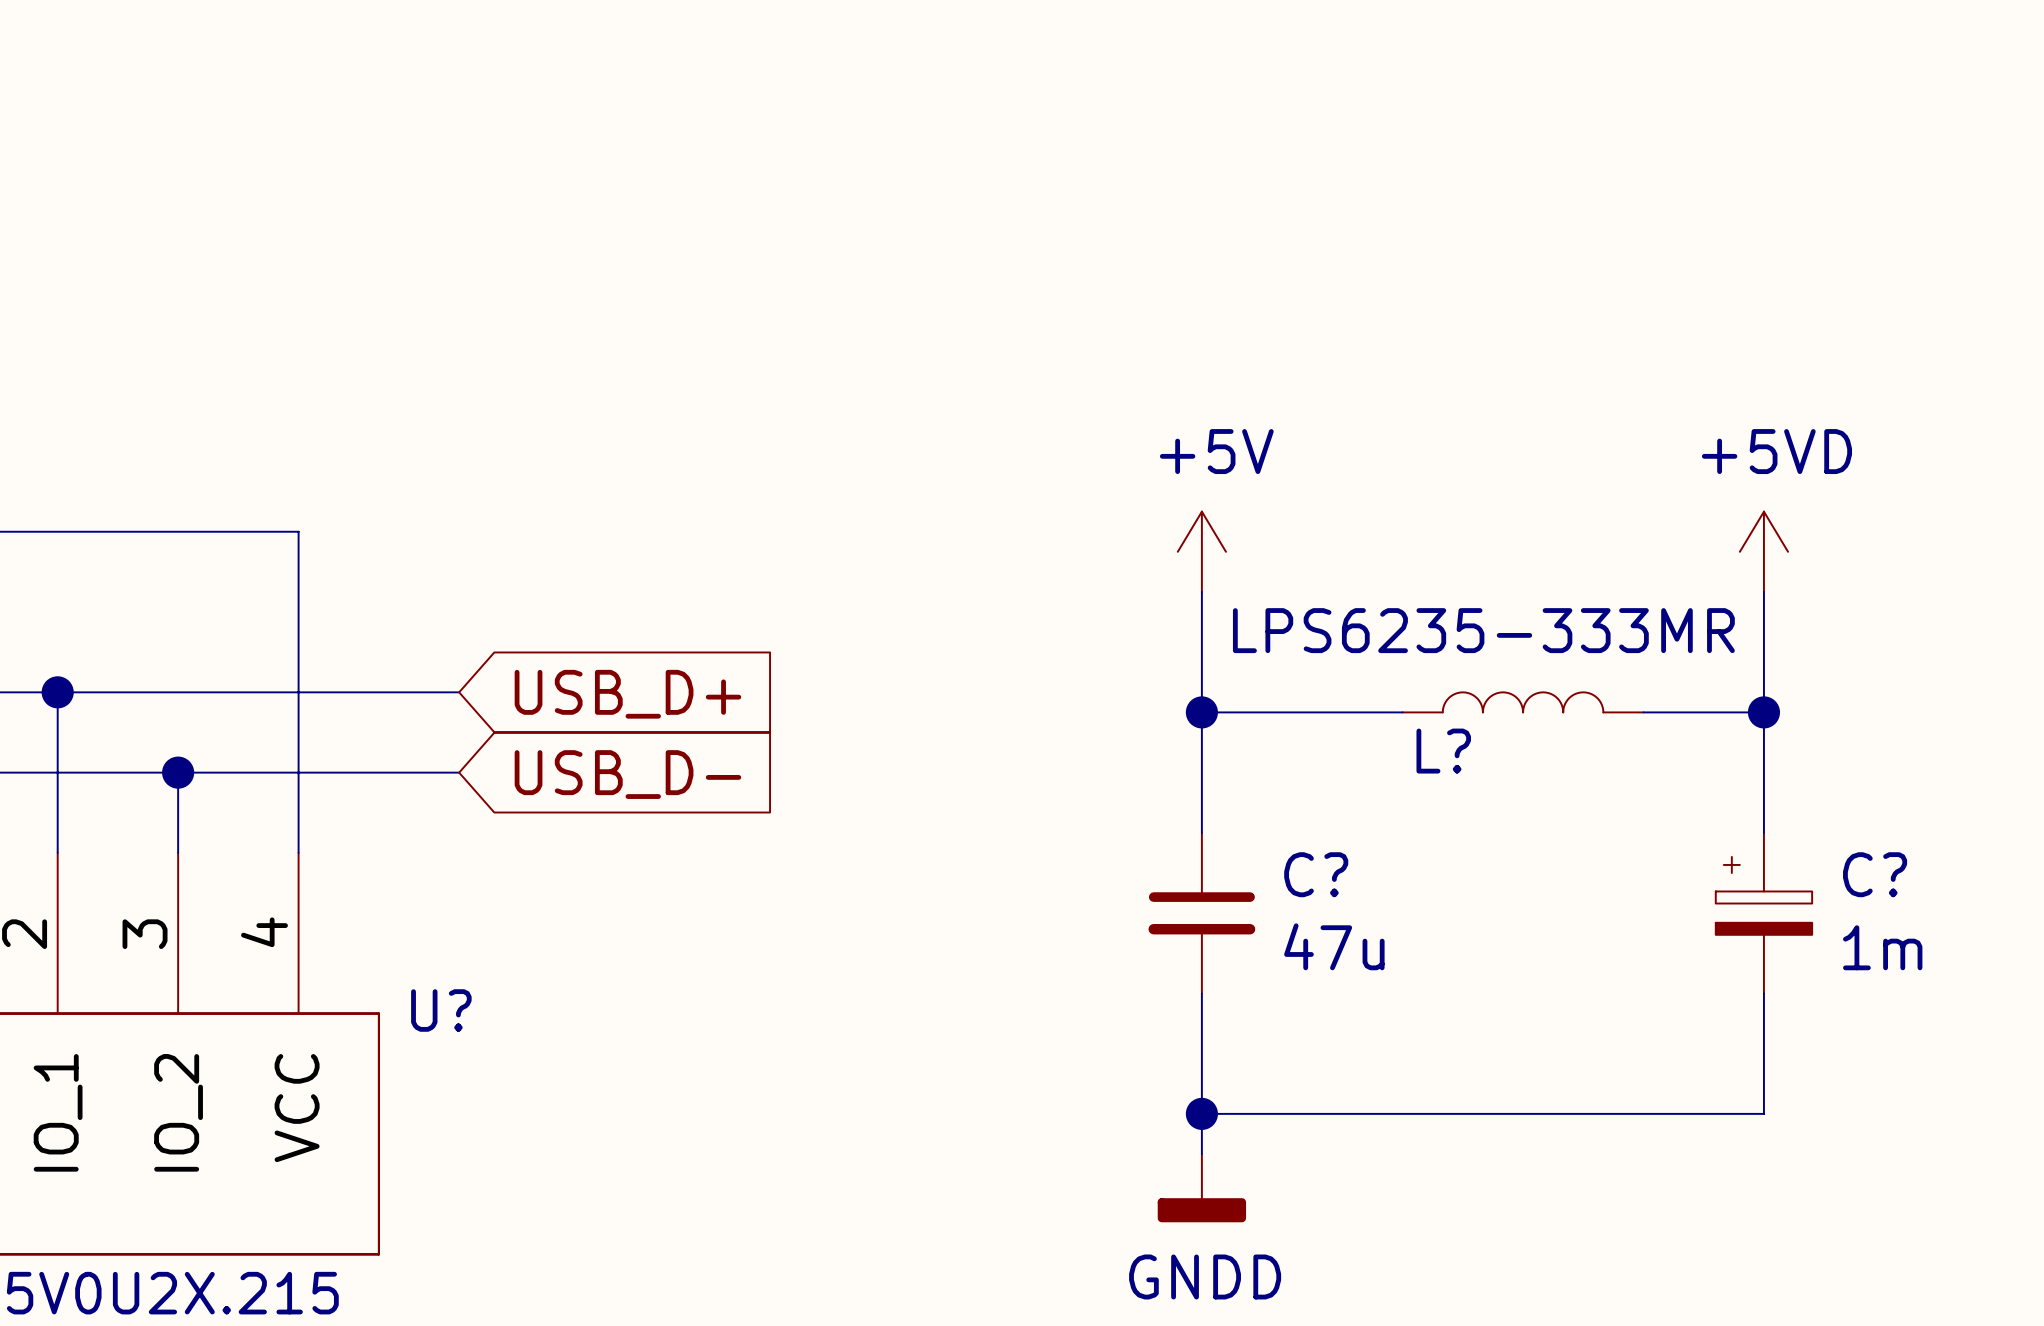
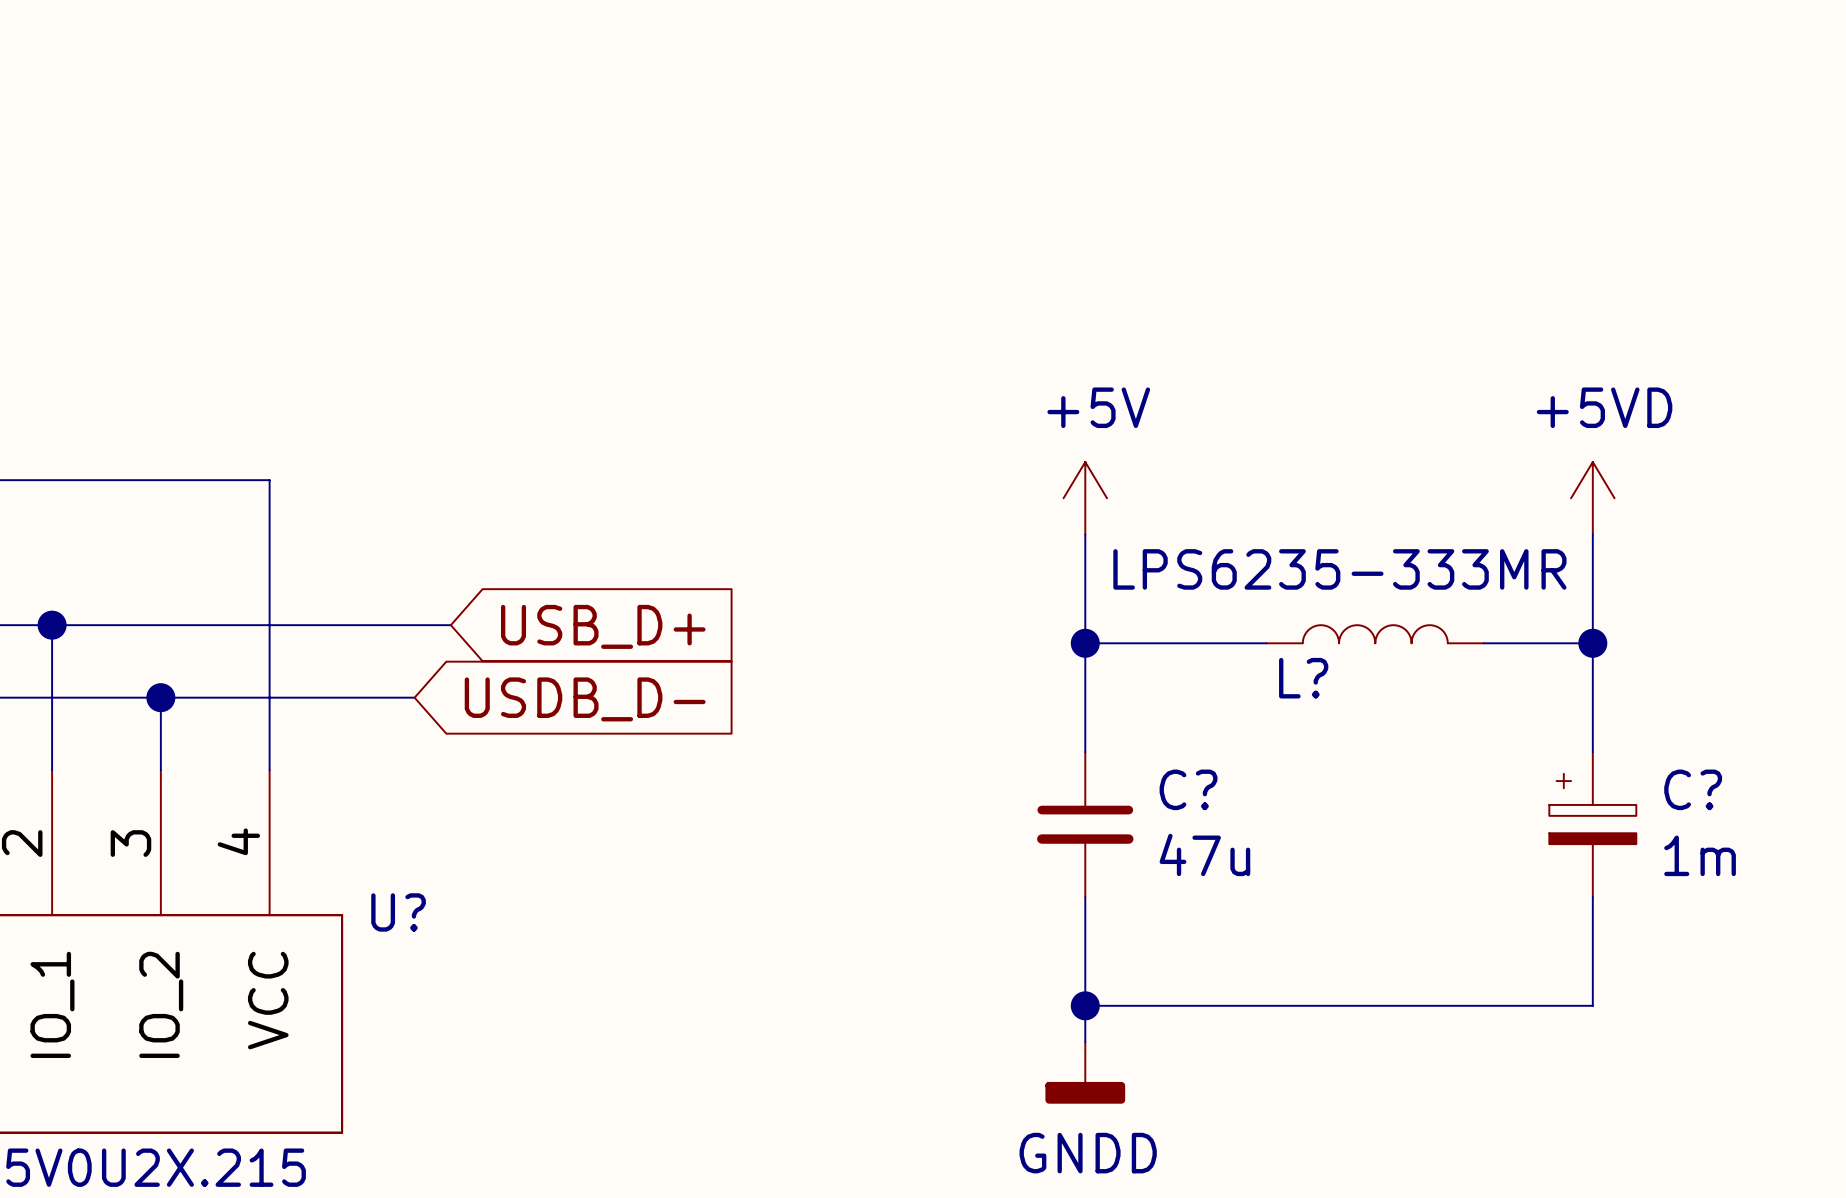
wire: none -> (414, 625) (450, 625)
global label position: USB_D+ (627, 694) -> USB_D+ (603, 626)
global label: USB_D- (627, 774) -> USDB_D- (585, 699)

